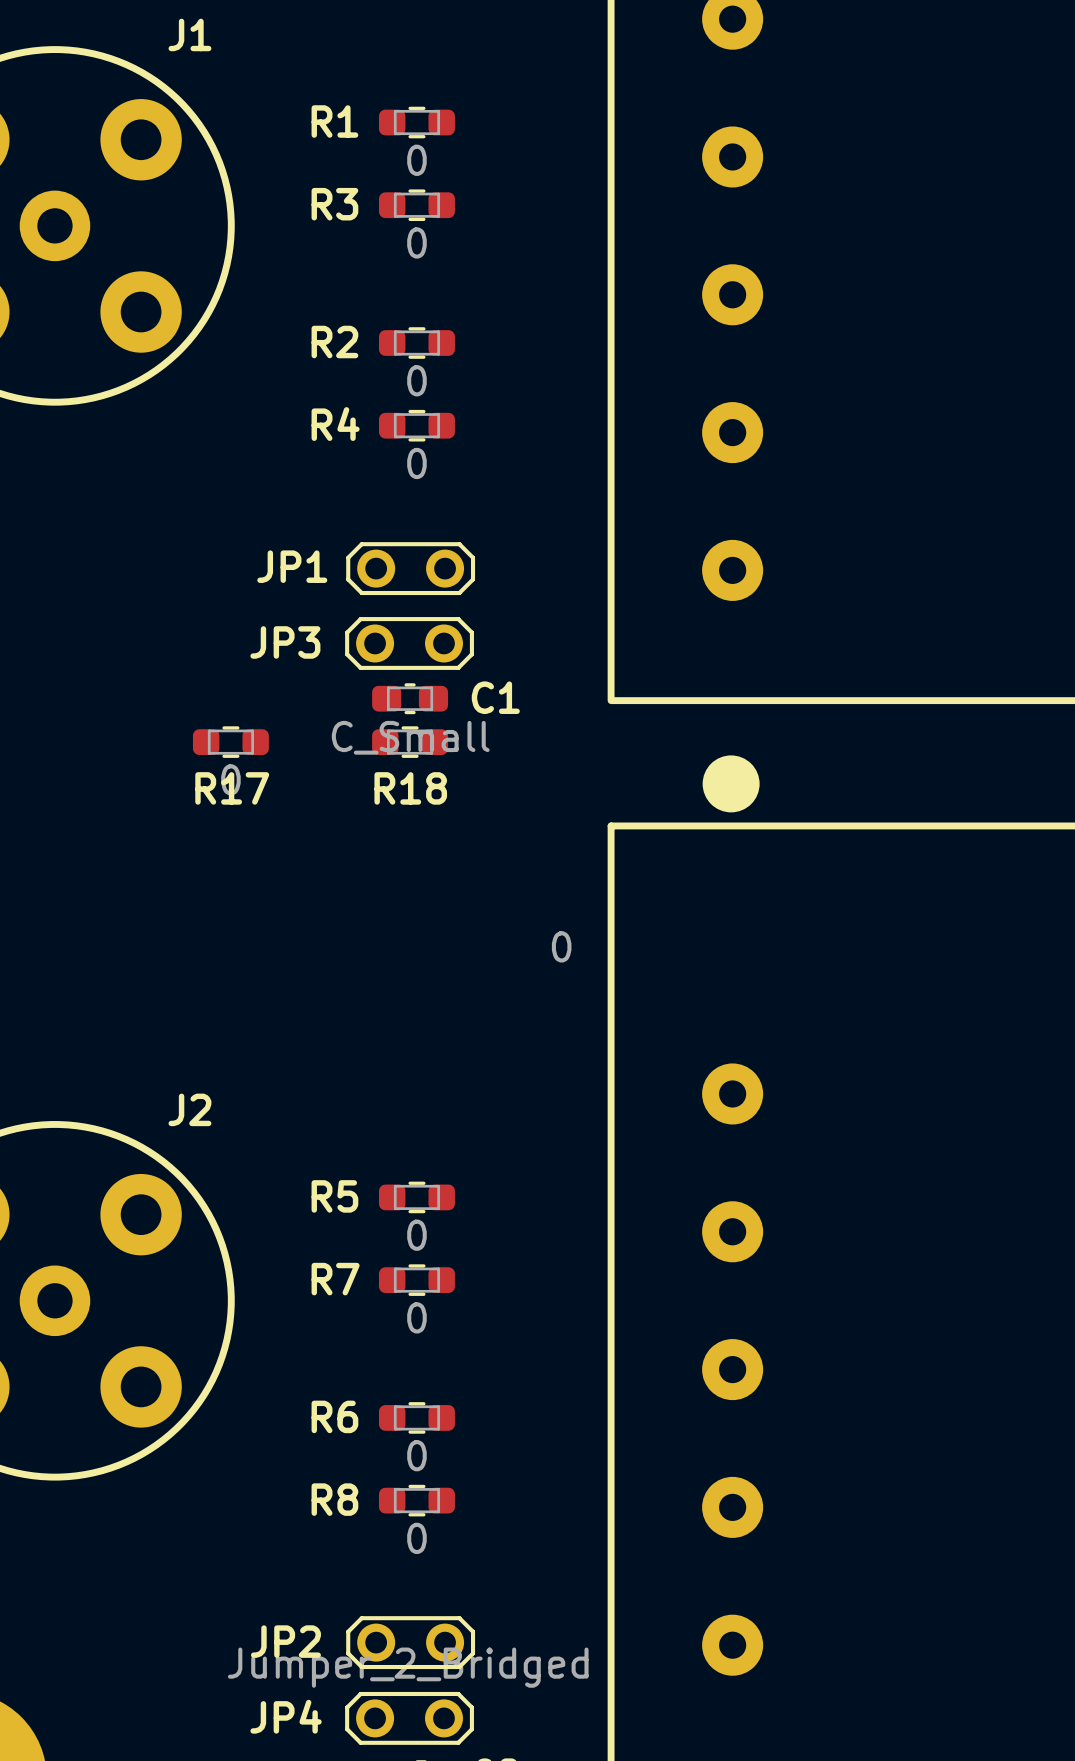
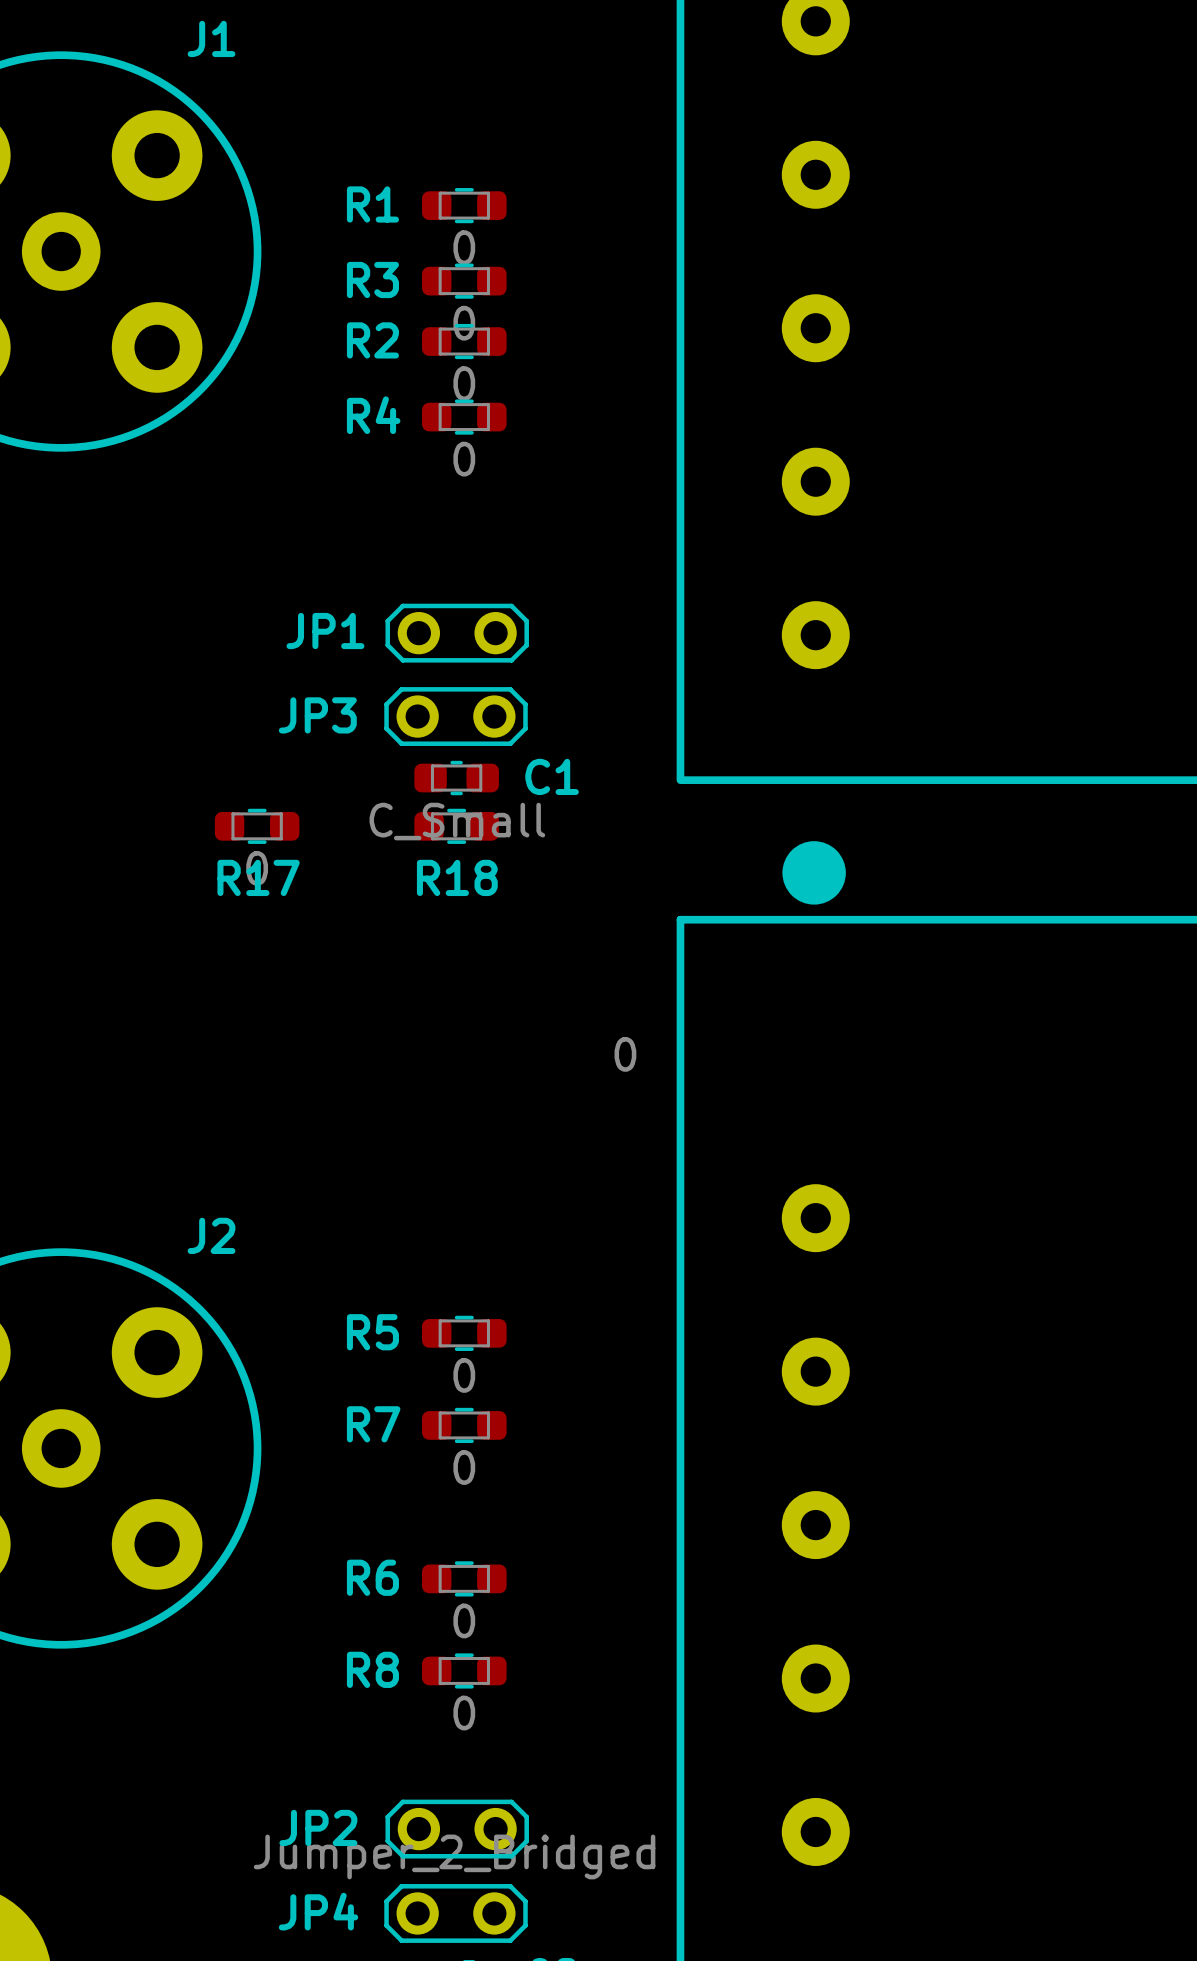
R1 position: (416, 122) -> (464, 205)
R3 position: (416, 205) -> (464, 281)
R2 position: (416, 343) -> (464, 341)
R4 position: (416, 425) -> (464, 417)

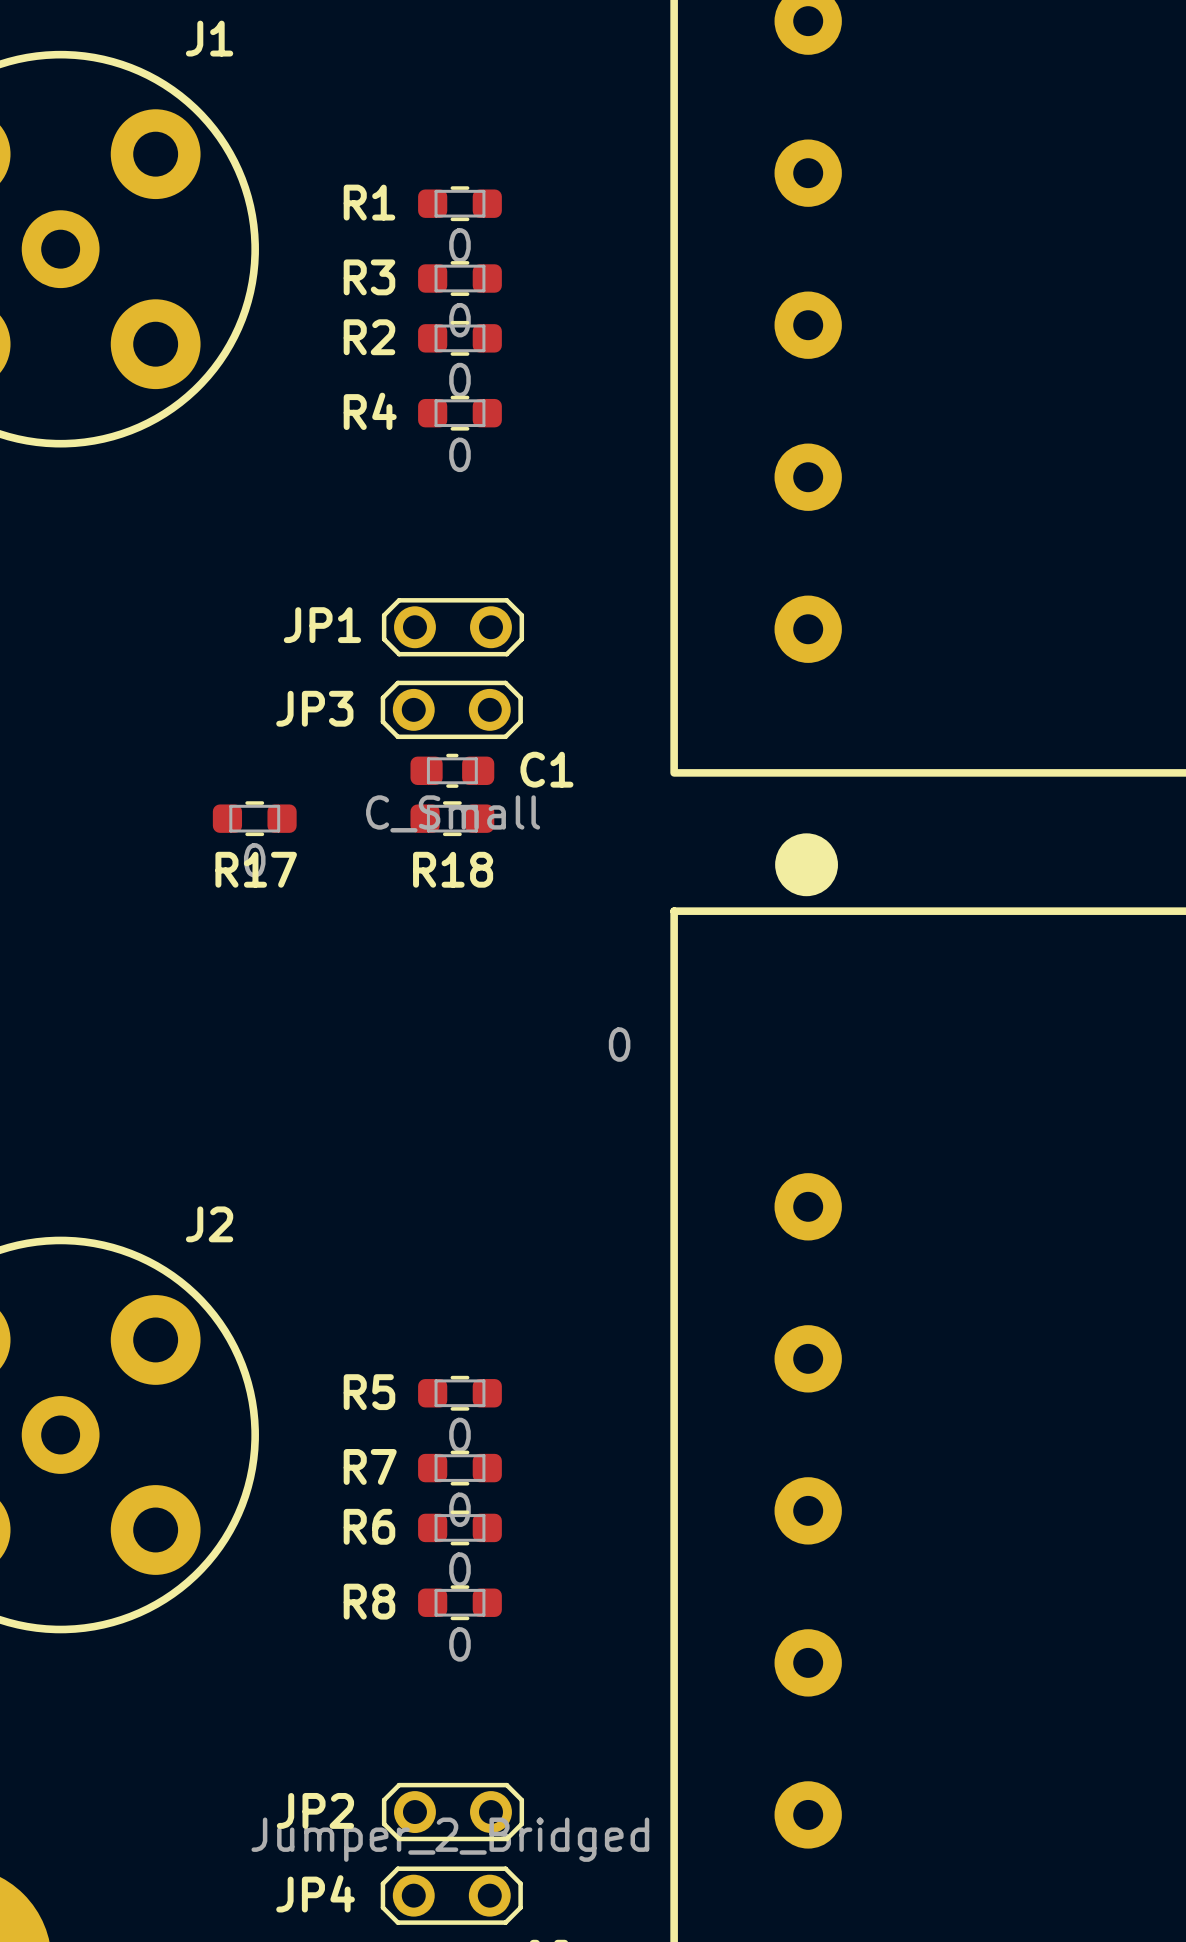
R5 position: (464, 1333) -> (459, 1393)
R7 position: (464, 1425) -> (459, 1468)
R6 position: (464, 1578) -> (459, 1527)
R8 position: (464, 1670) -> (459, 1602)

